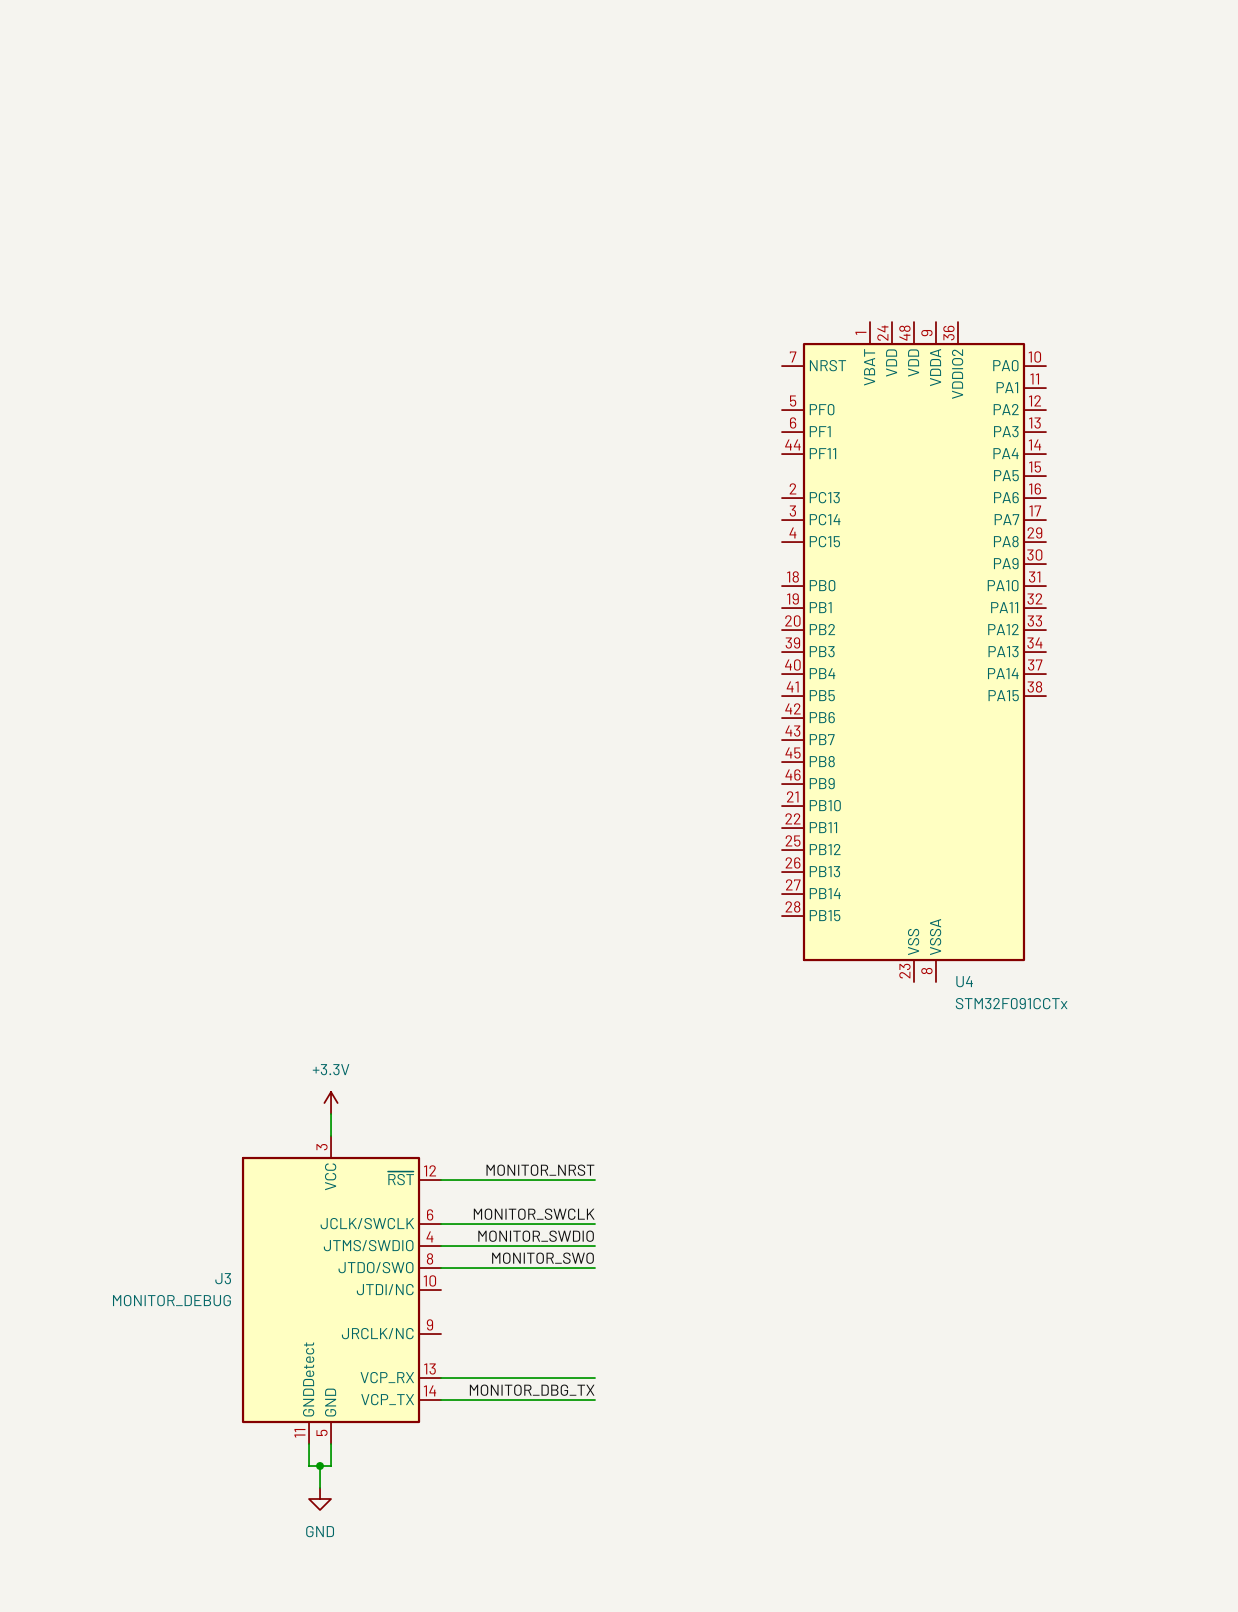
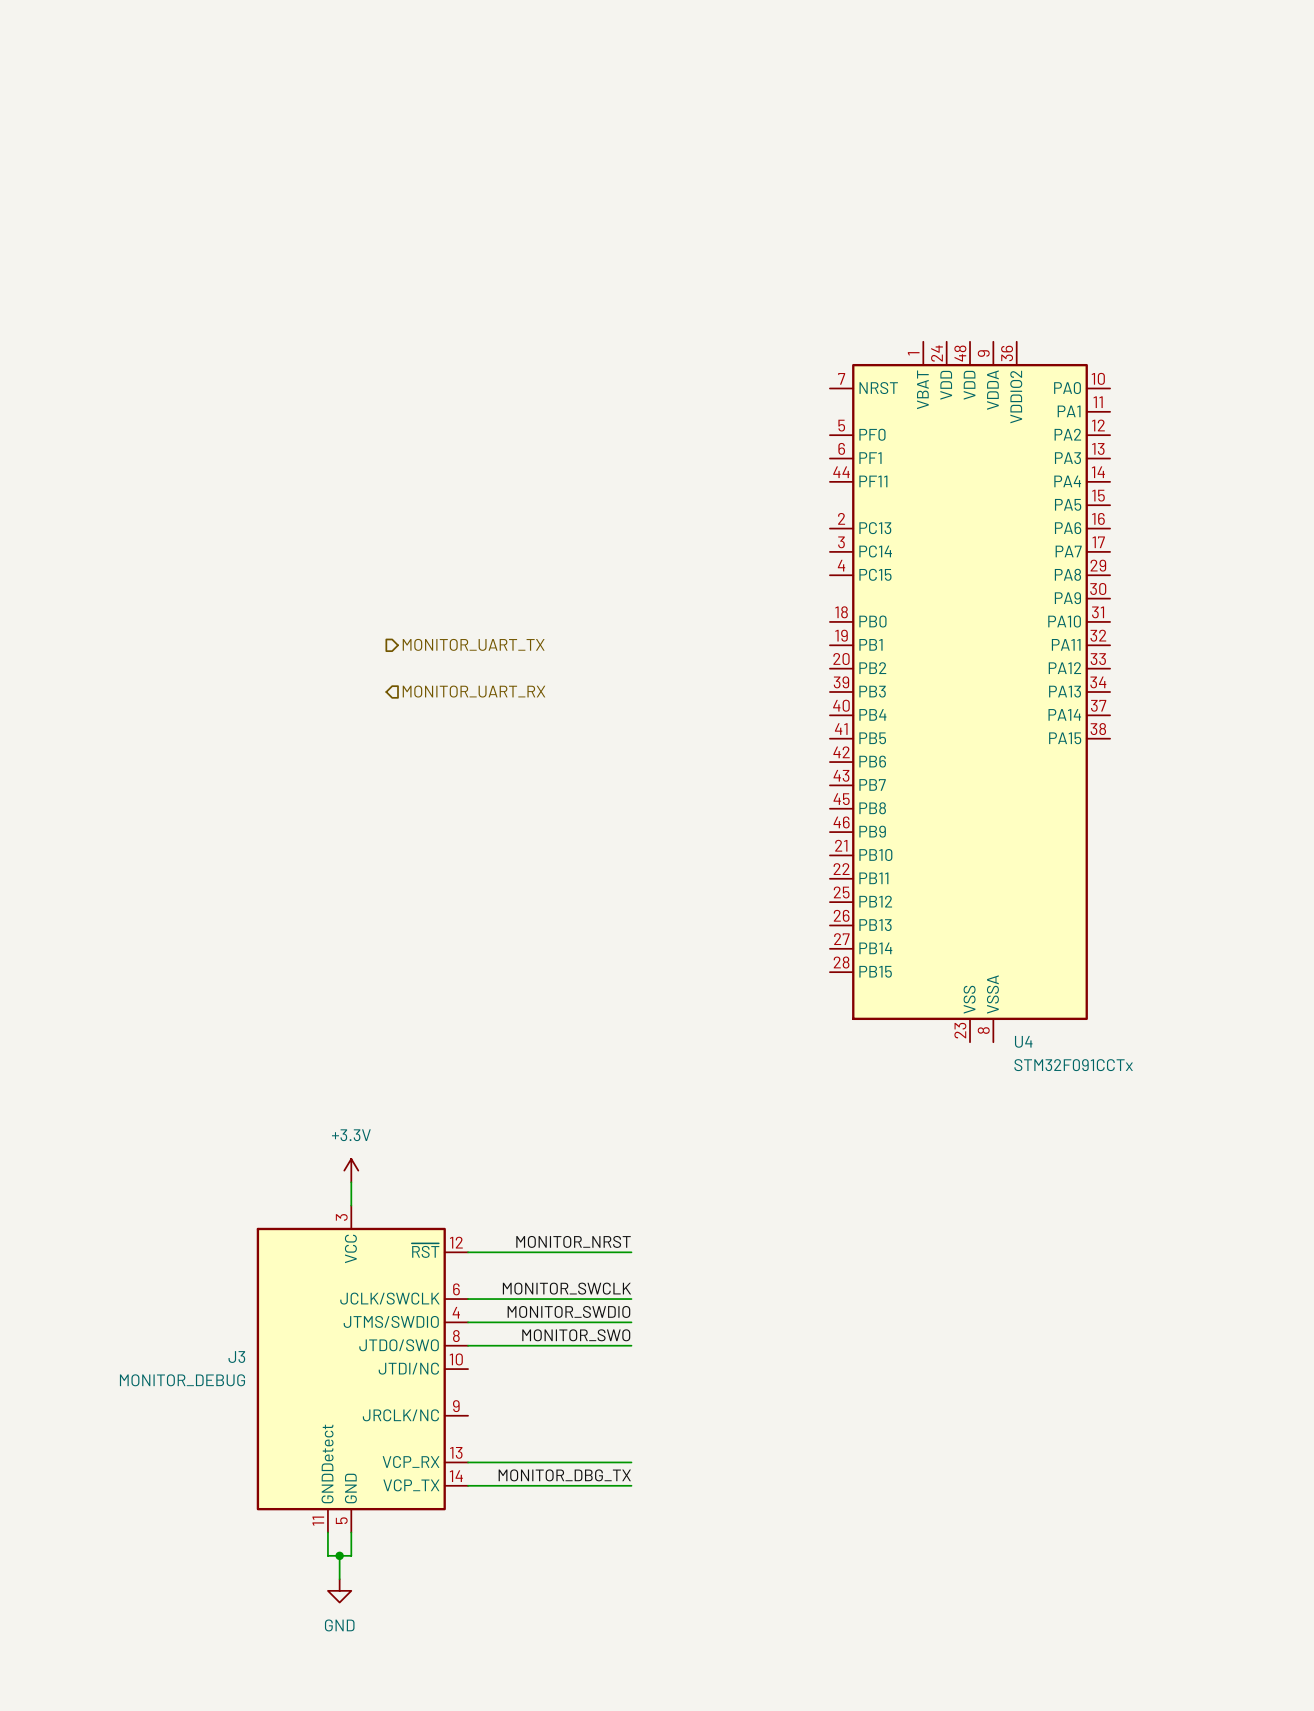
hierarchical label: none -> MONITOR_UART_TX (473, 644)
hierarchical label: none -> MONITOR_UART_RX (473, 691)

